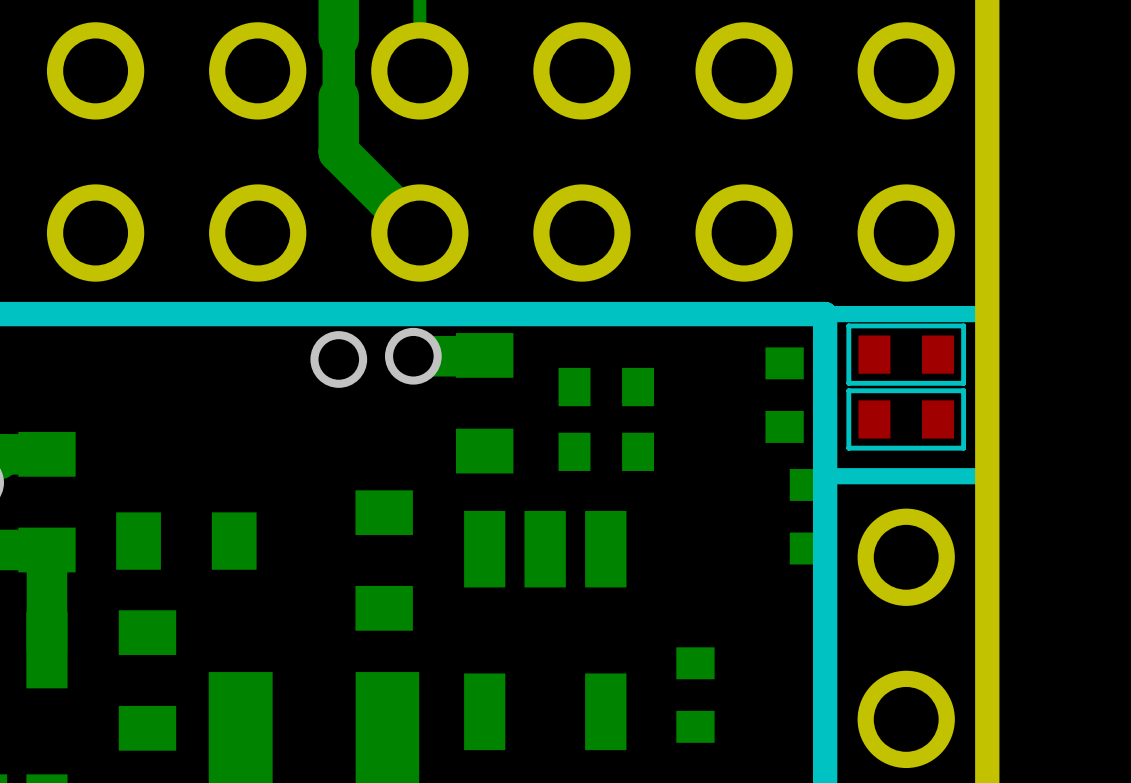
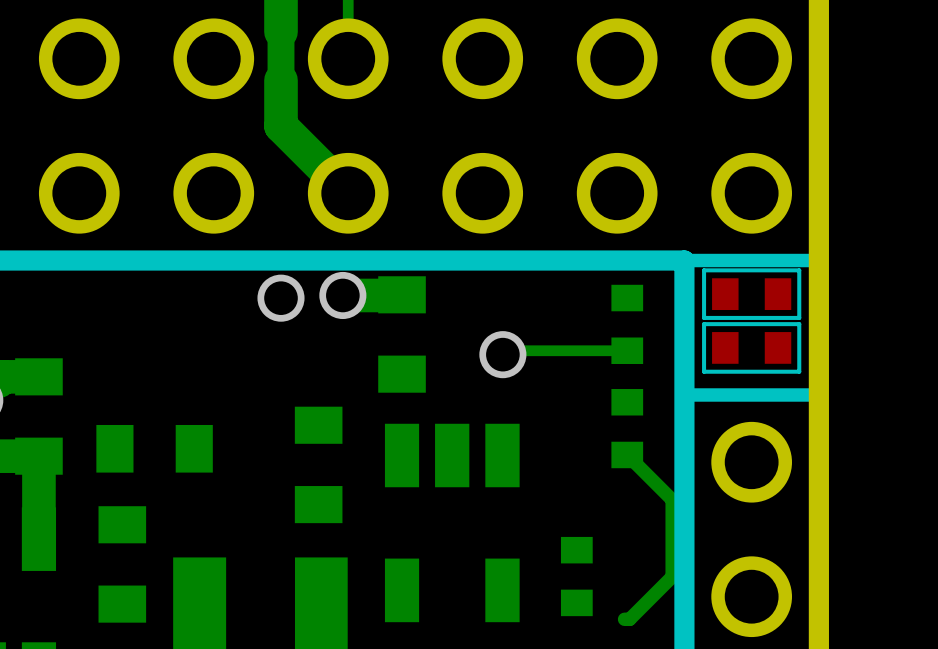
part: (606, 387) -> none
part position: (784, 395) -> (627, 324)
bottom track: none -> (627, 350) (506, 350) (502, 354)
via: none -> (502, 354)
part: (606, 451) -> none
part position: (808, 516) -> (627, 428)
bottom track: none -> (627, 454) (672, 499) (672, 576) (629, 619) (624, 619)

